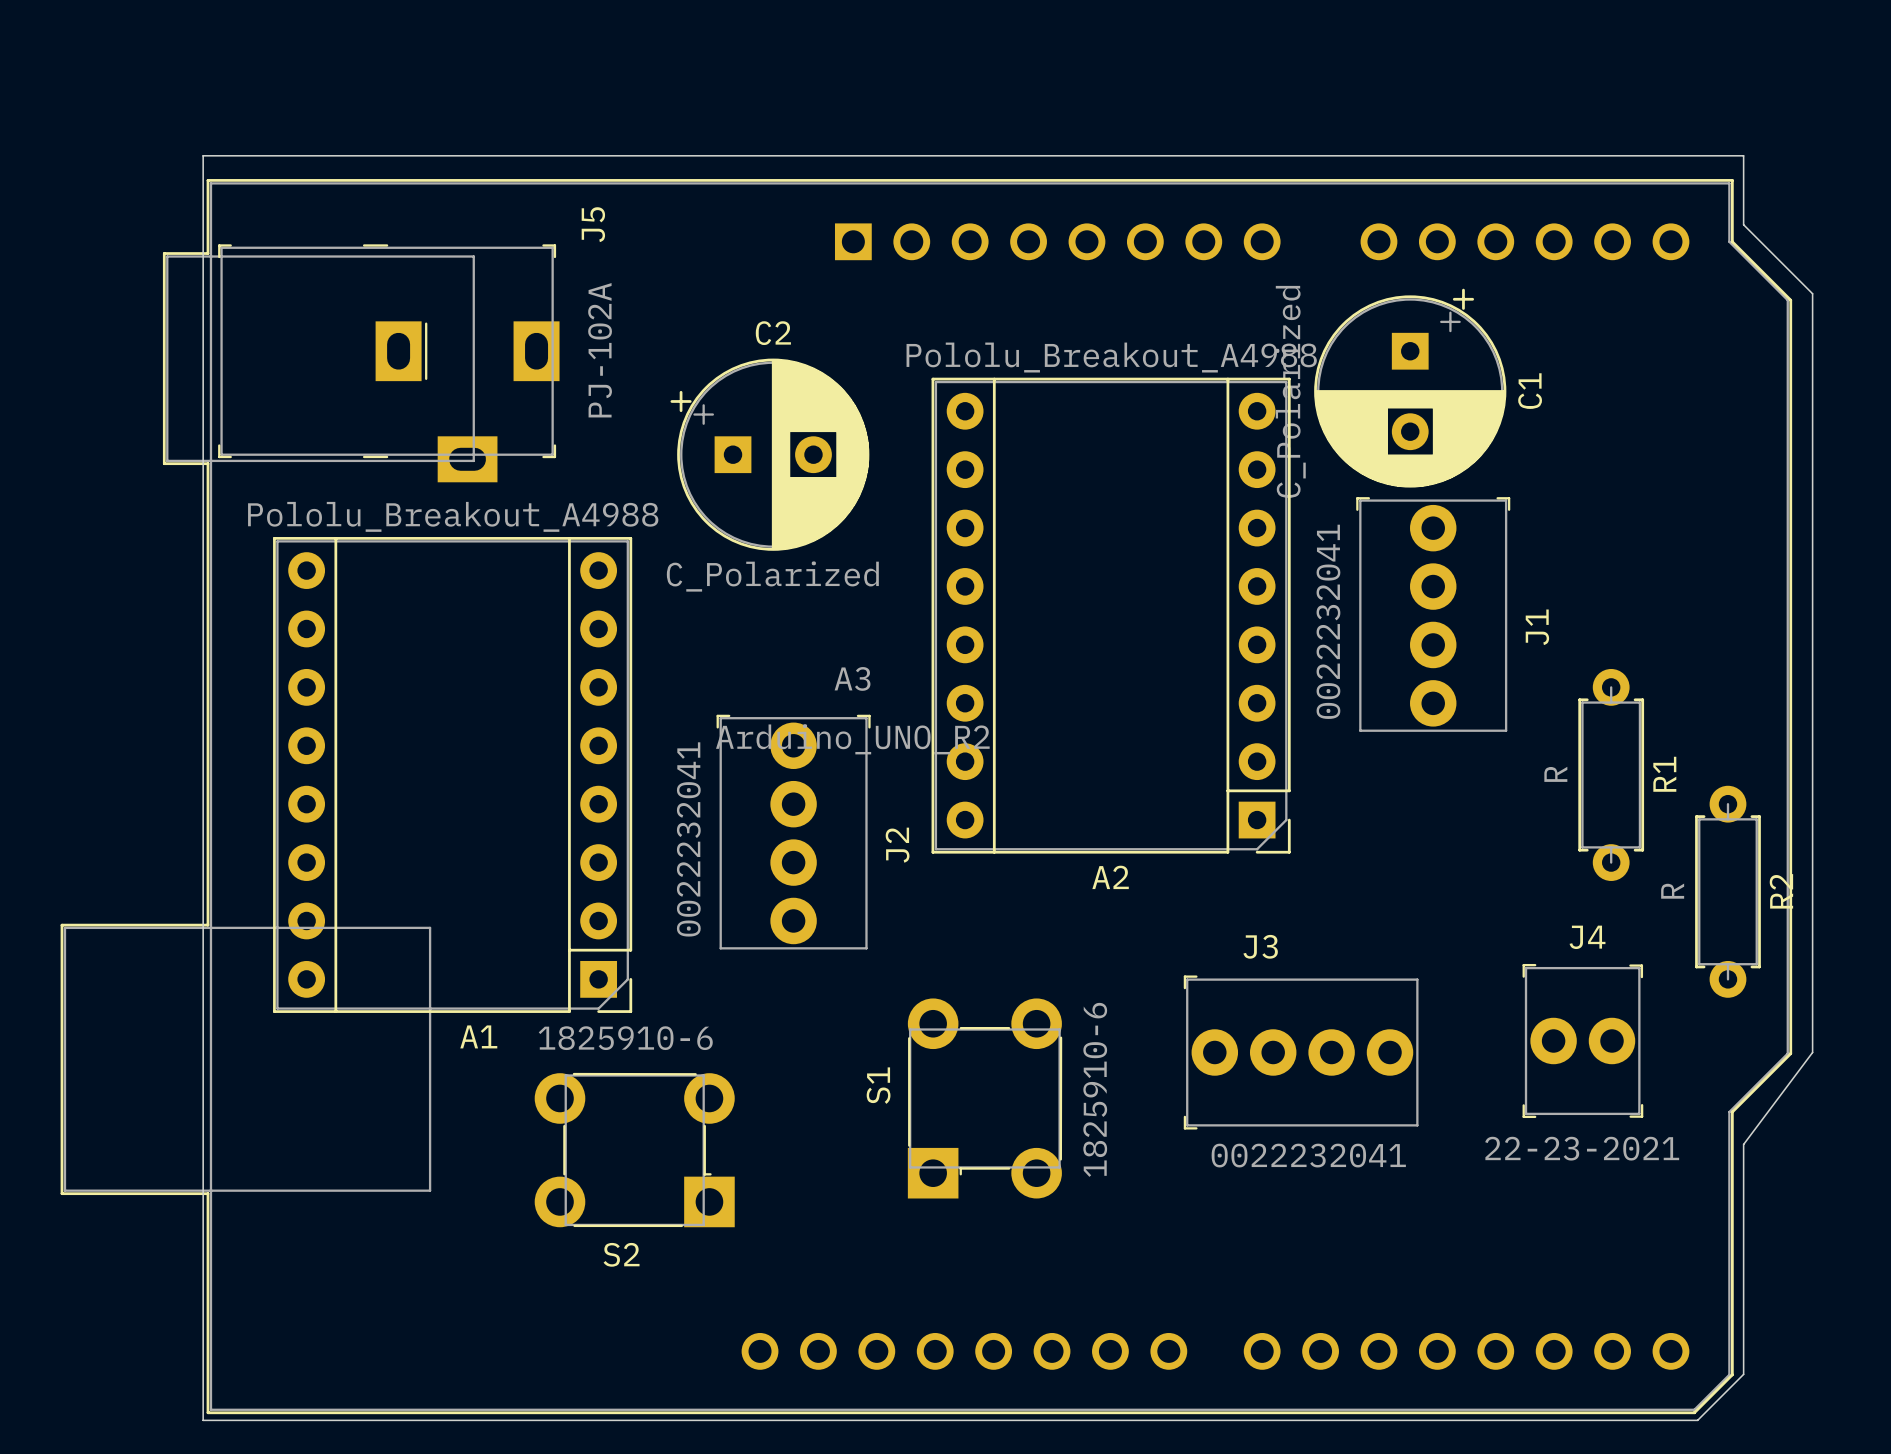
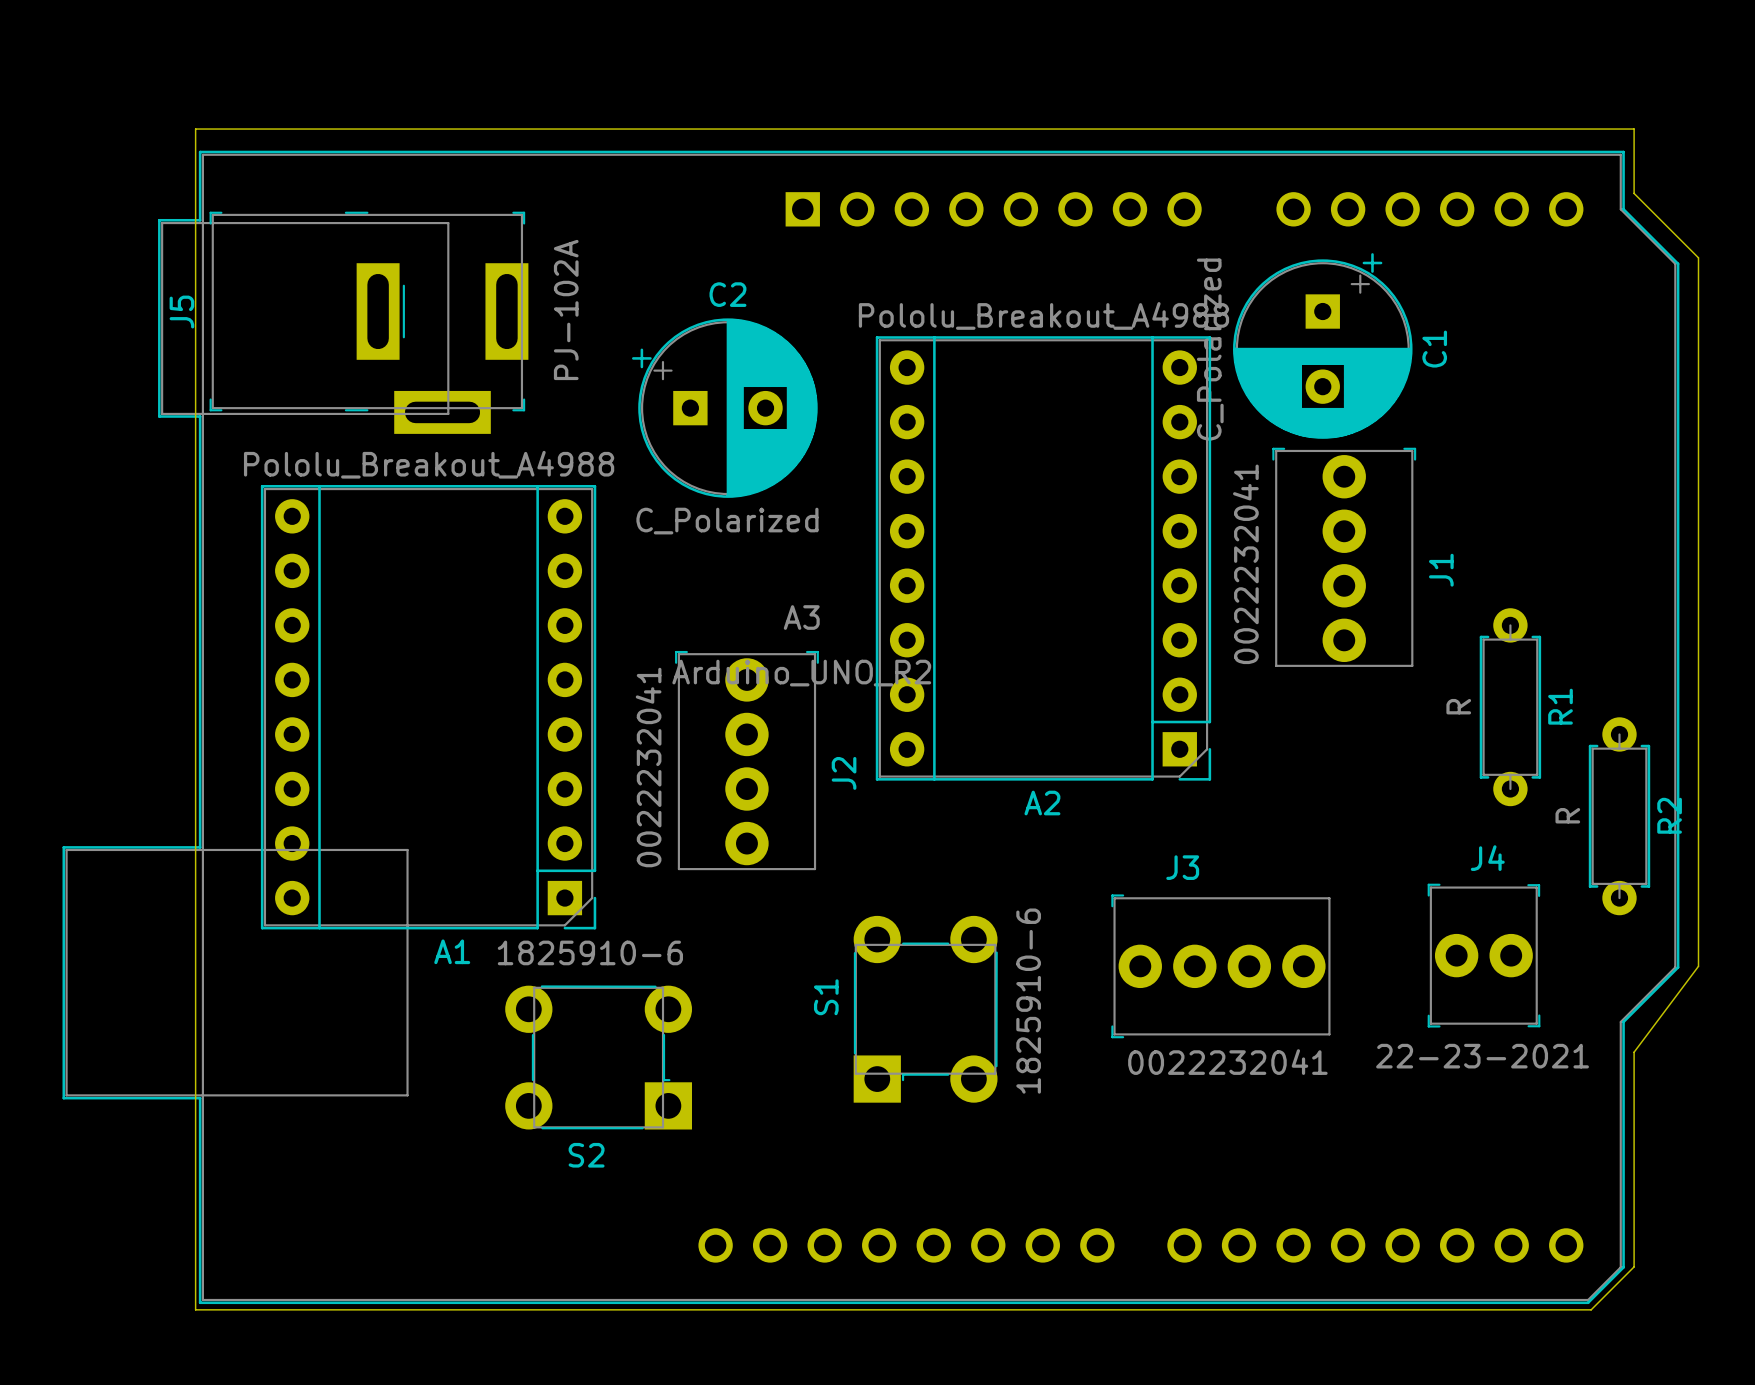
J5 name position: J5 (593, 224) -> J5 (181, 312)
J5 footprint: [218, 244, 560, 483] -> [209, 211, 529, 434]

